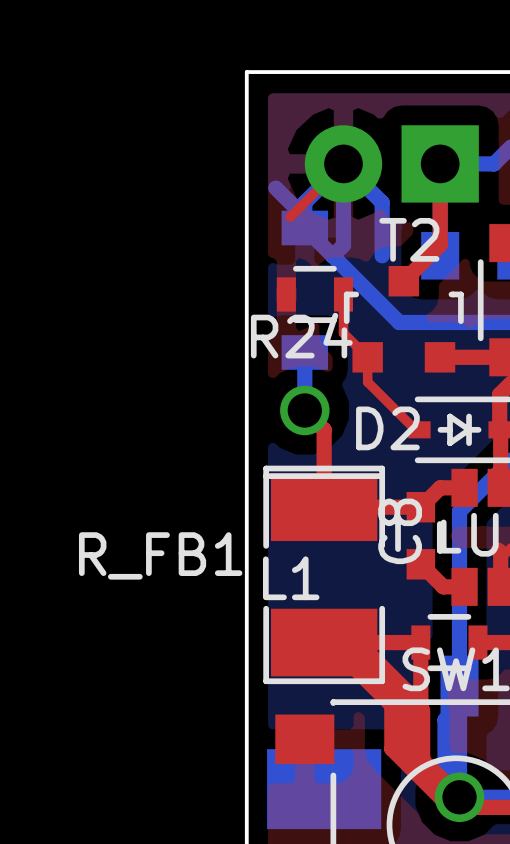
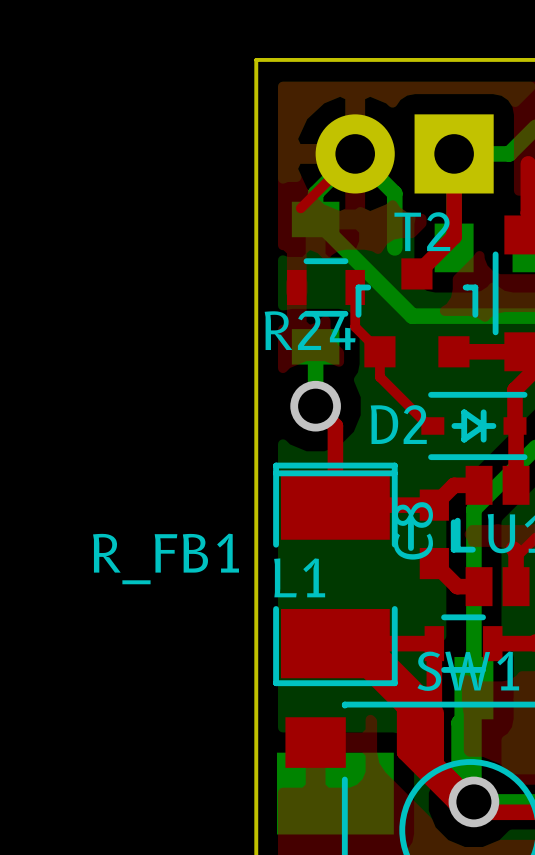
bottom track: (343, 163) (343, 245) (332, 255) -> none
bottom track: (275, 188) (304, 217) -> none

